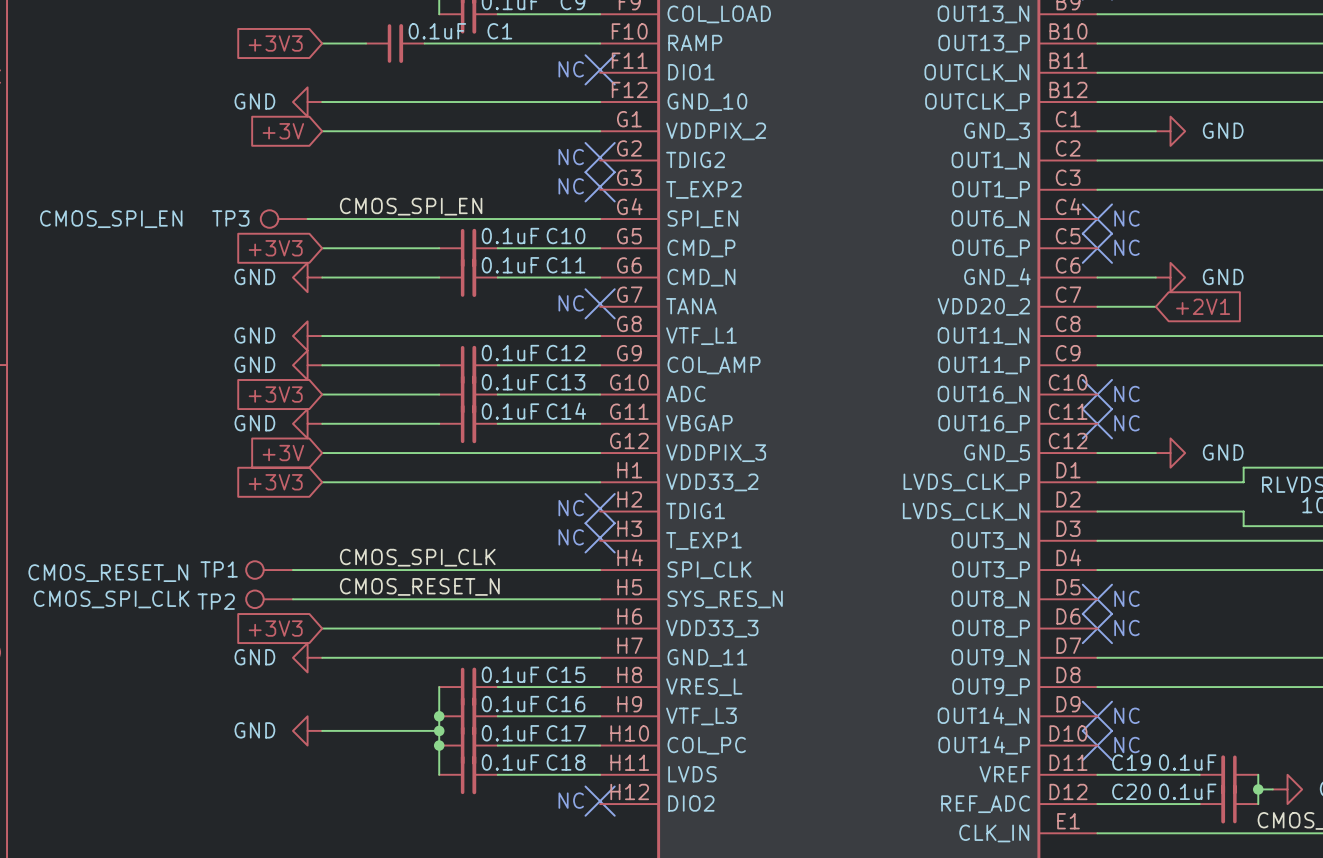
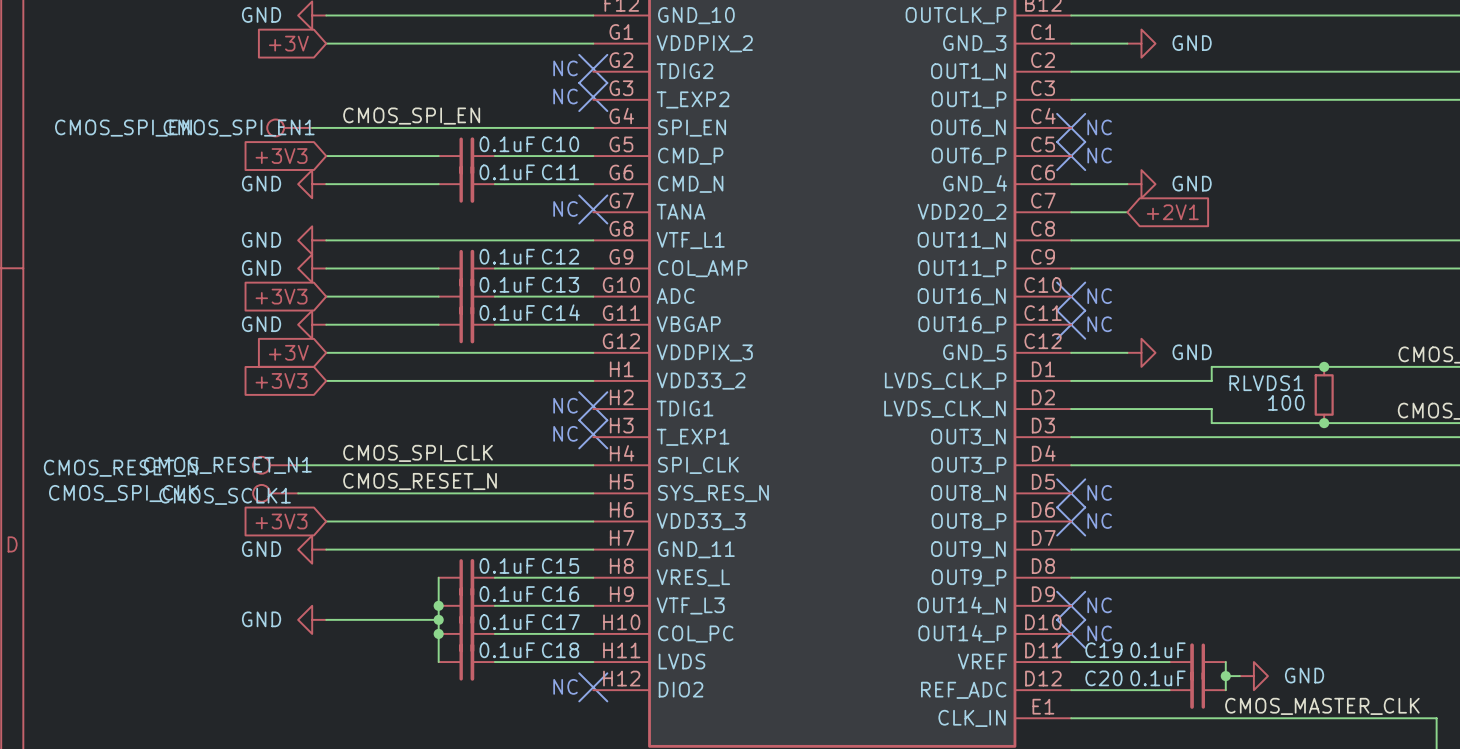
TP3 name: TP3 (230, 218) -> CMOS_SPI_EN1 (239, 128)
TP1 name: TP1 (219, 569) -> CMOS_RESET_N1 (227, 465)
TP2 name: TP2 (216, 601) -> CMOS_SCLK1 (225, 496)

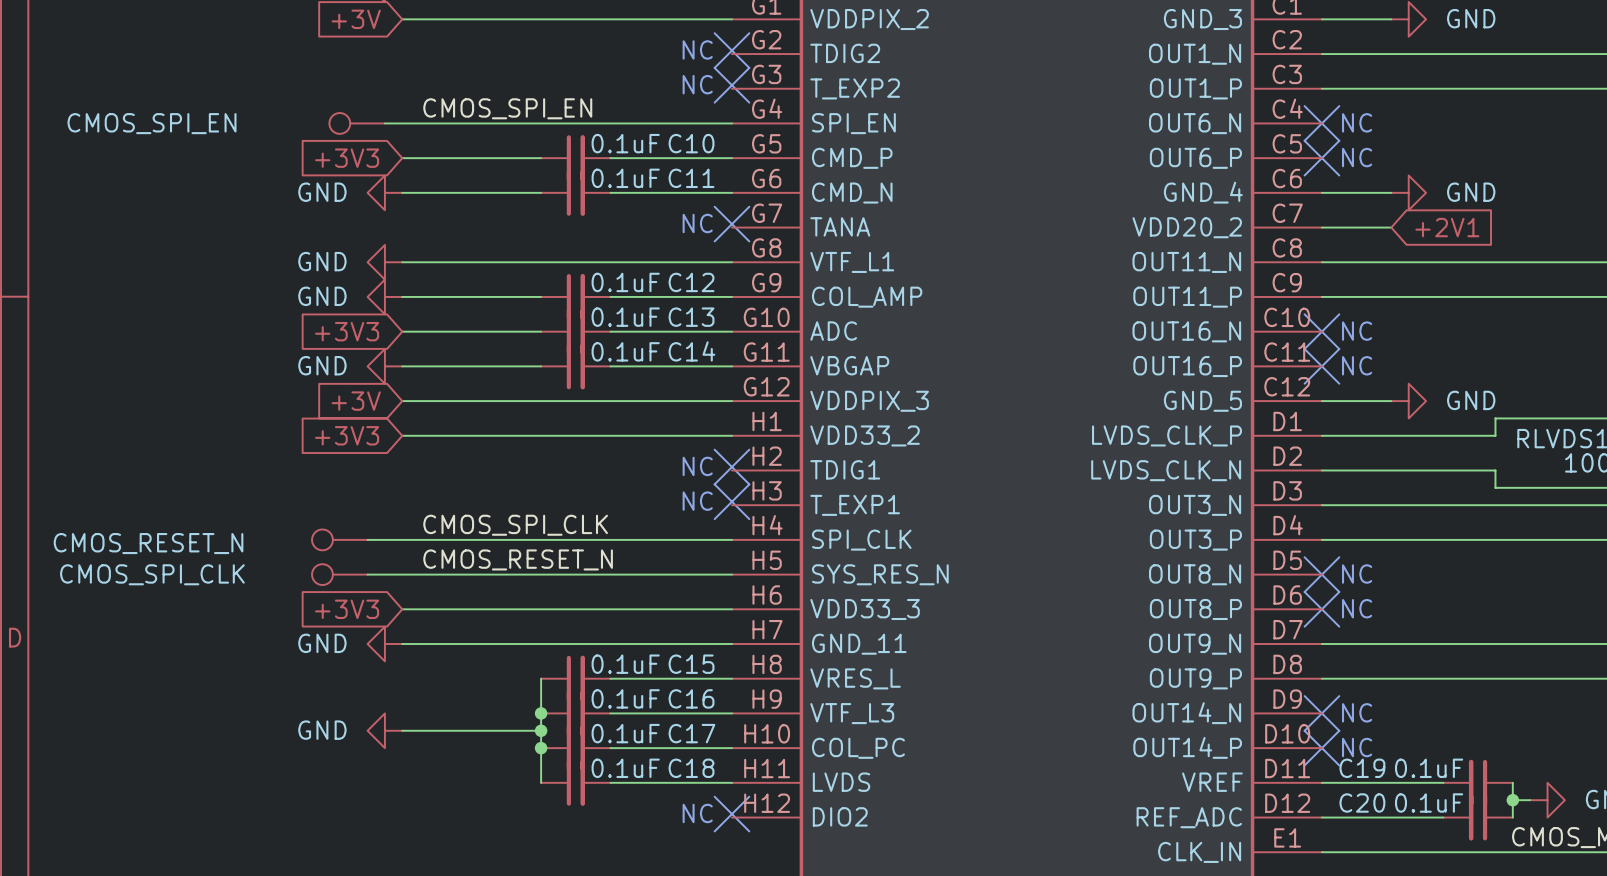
CMOS_SPI_EN1 name: CMOS_SPI_EN1 (239, 128) -> none
CMOS_RESET_N1 name: CMOS_RESET_N1 (227, 465) -> none
CMOS_SCLK1 name: CMOS_SCLK1 (225, 496) -> none

